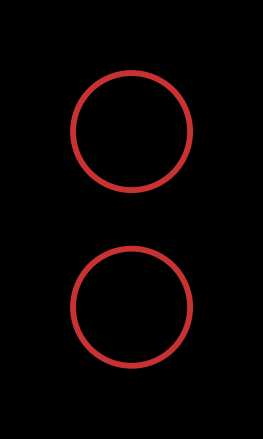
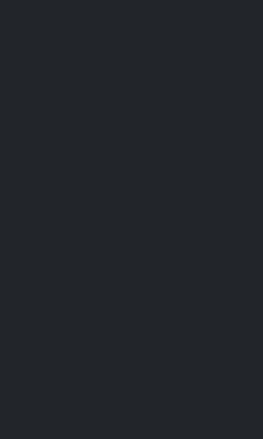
part: (131, 131) -> none
part: (131, 307) -> none

